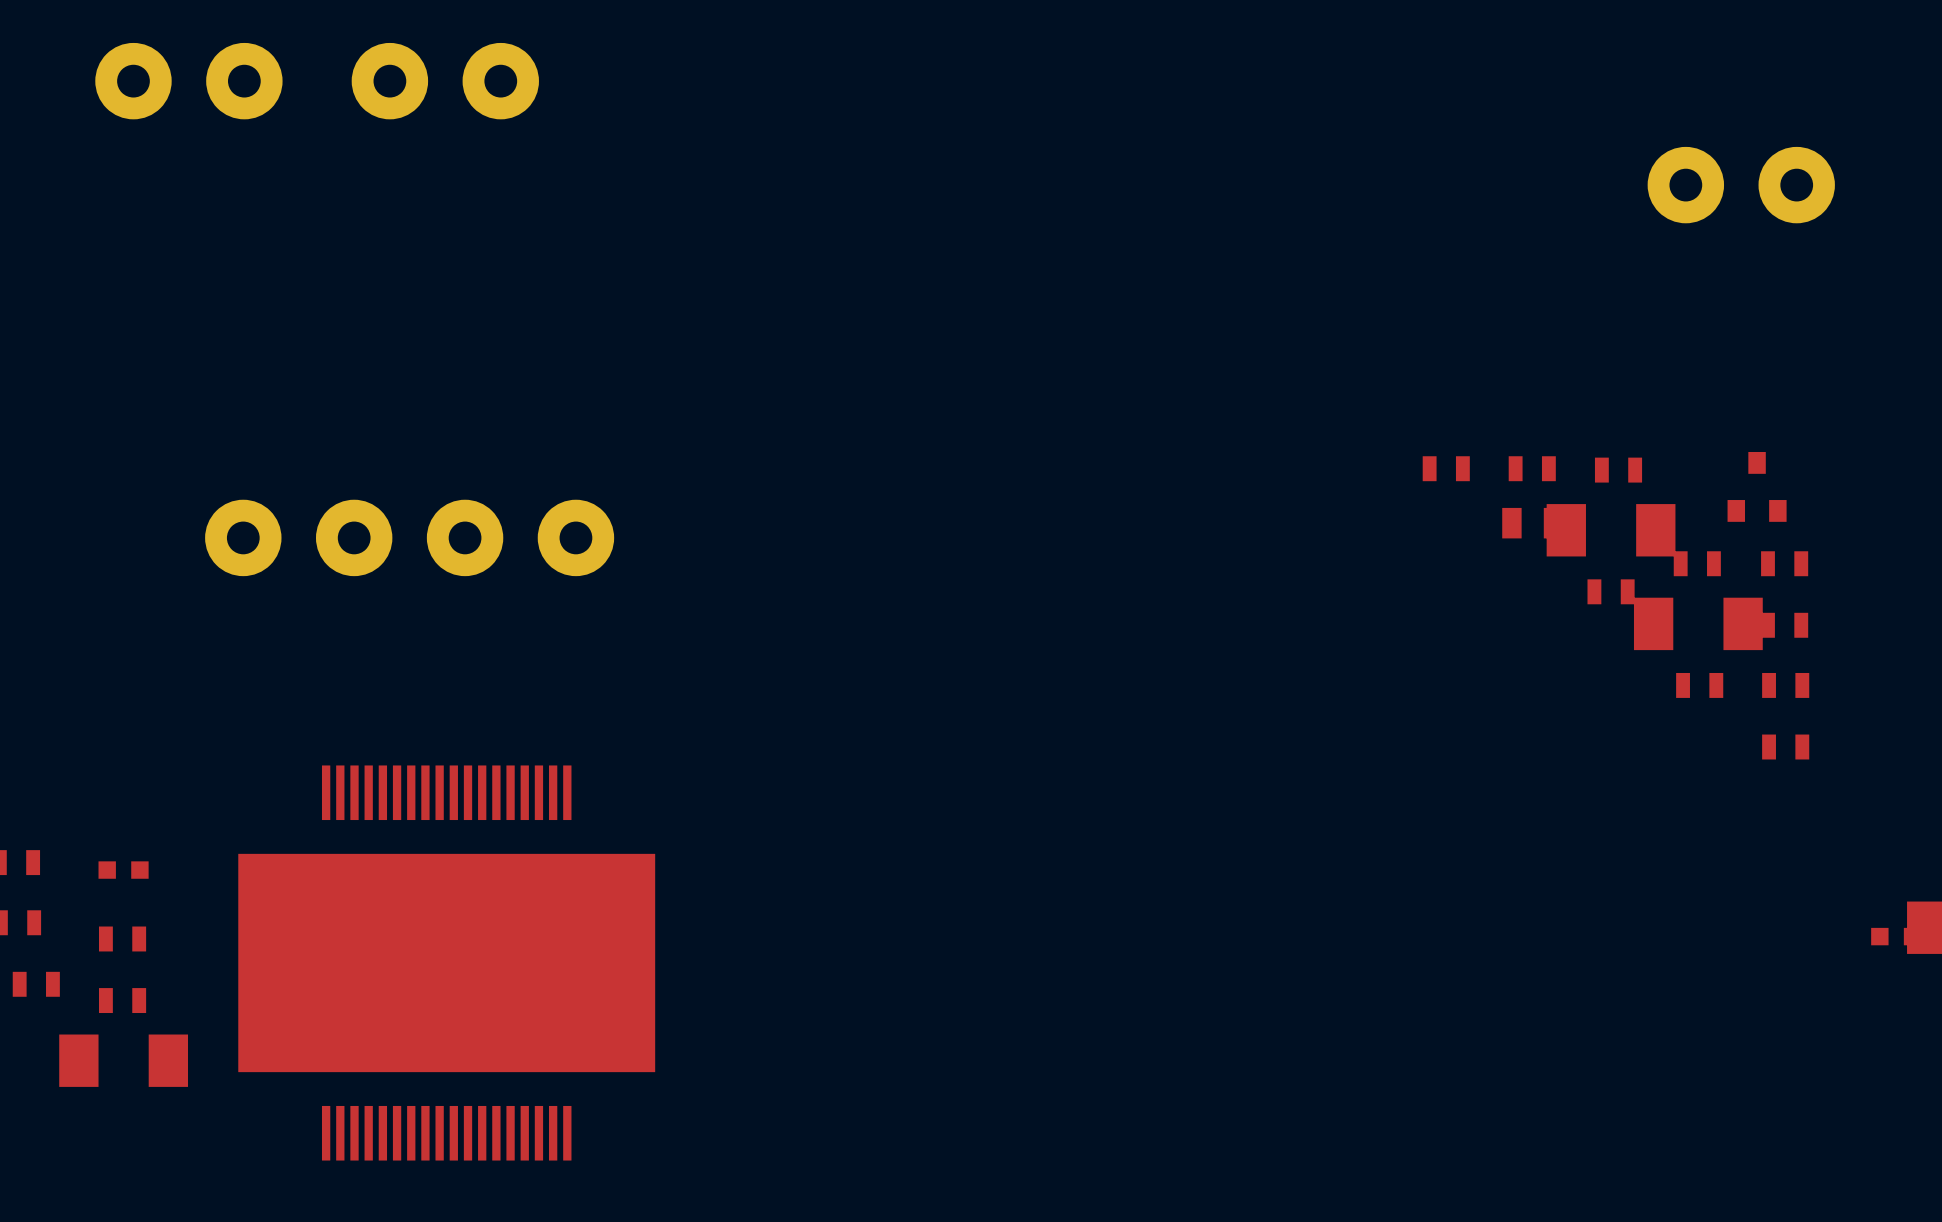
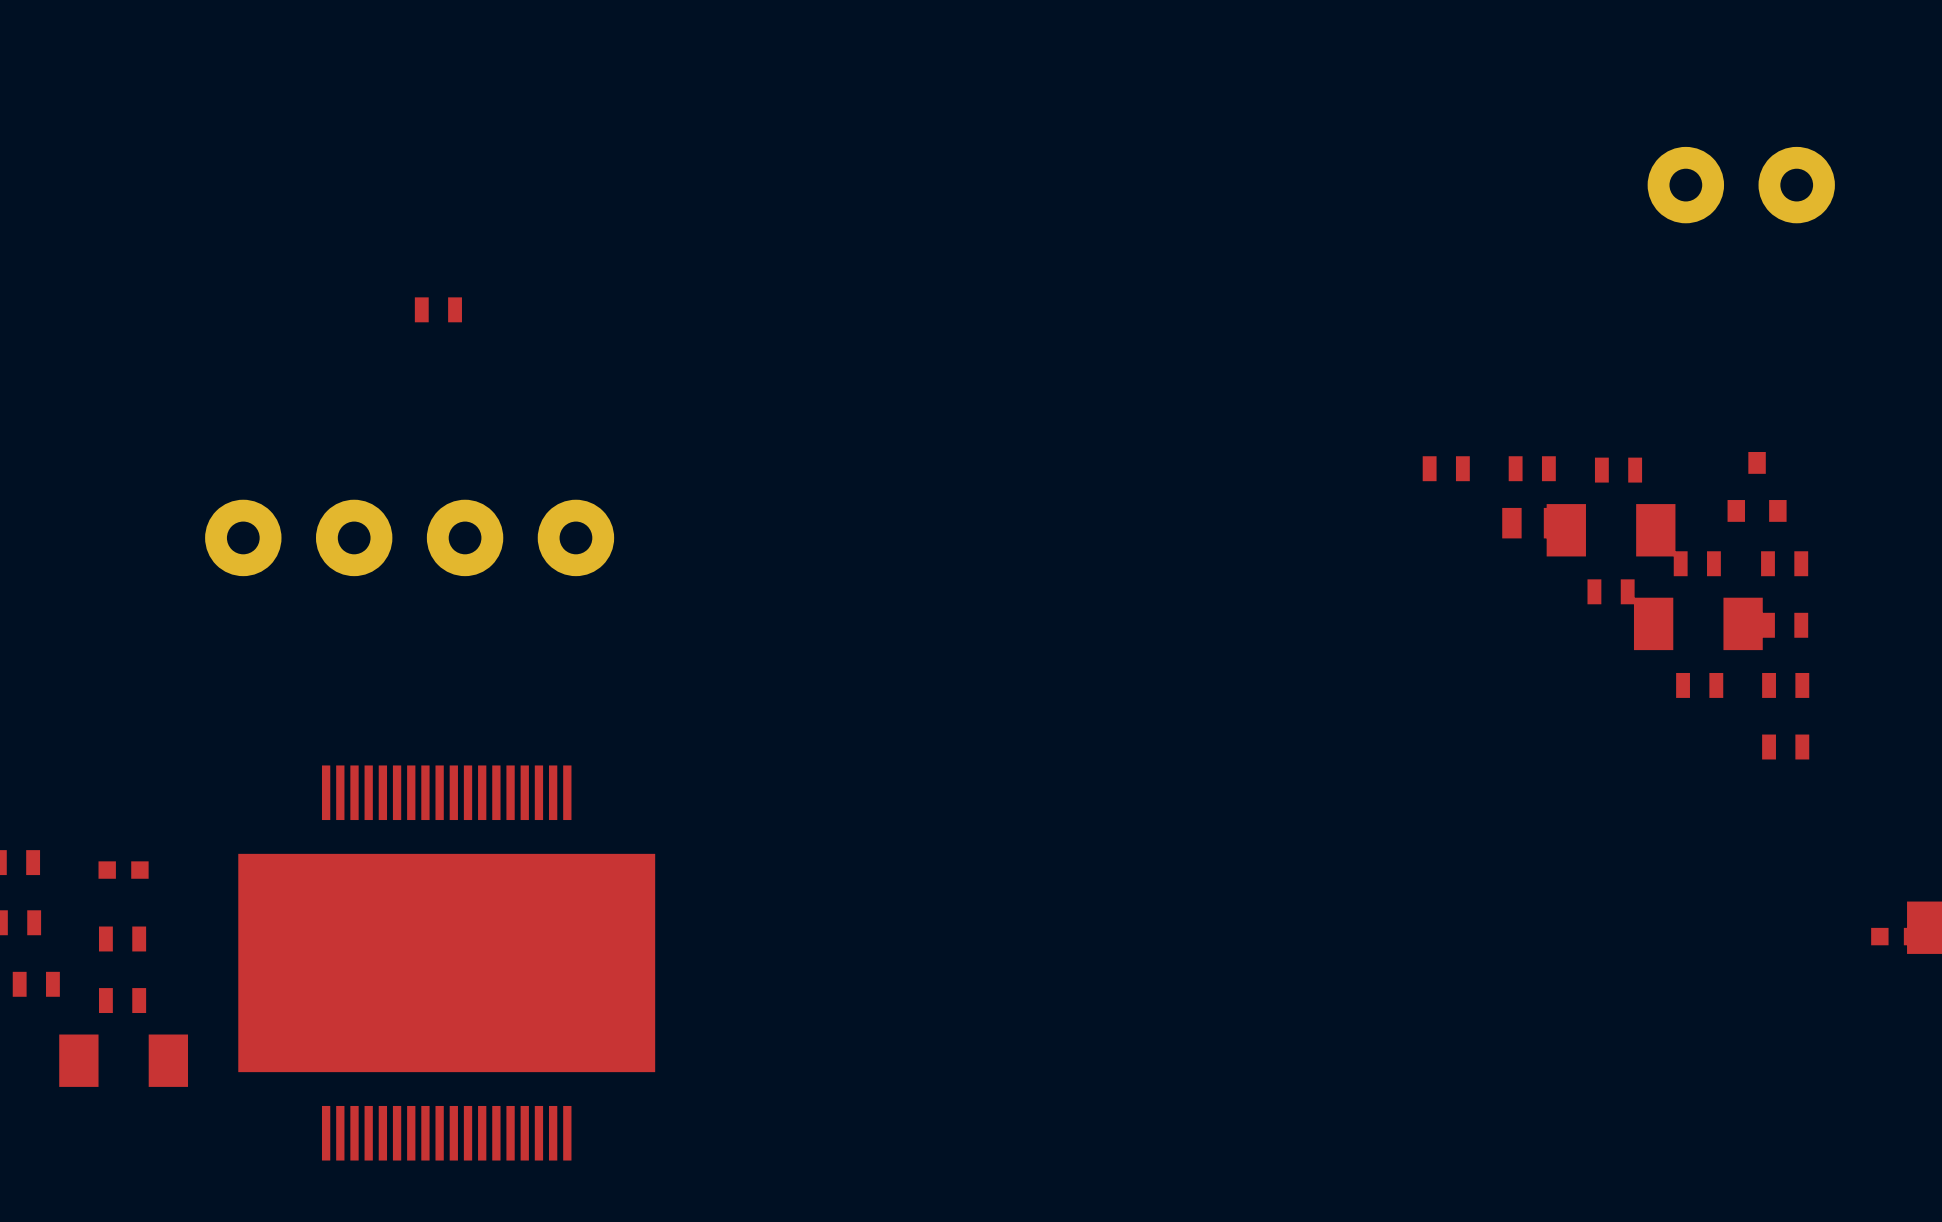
part: (188, 81) -> none
part: (445, 81) -> none
part: none -> (438, 309)

